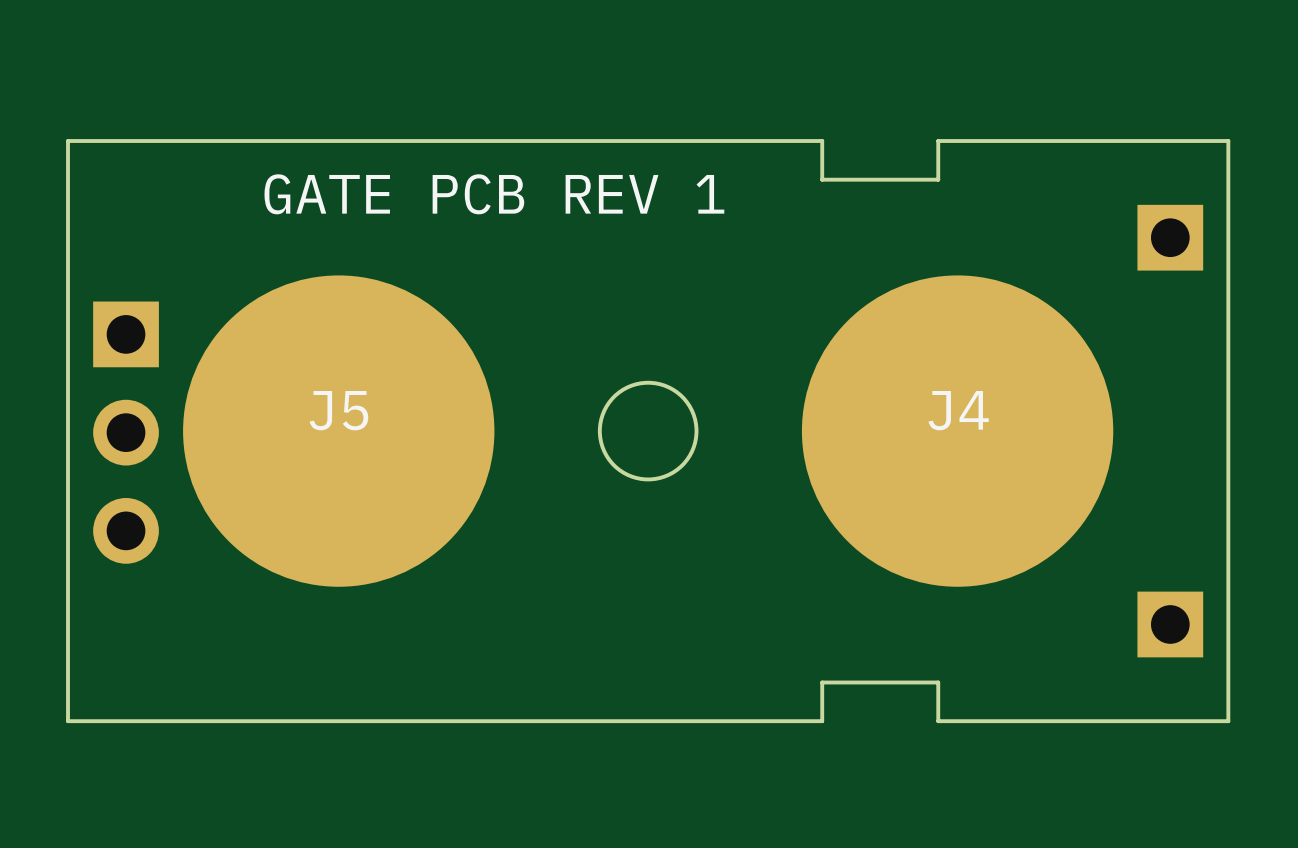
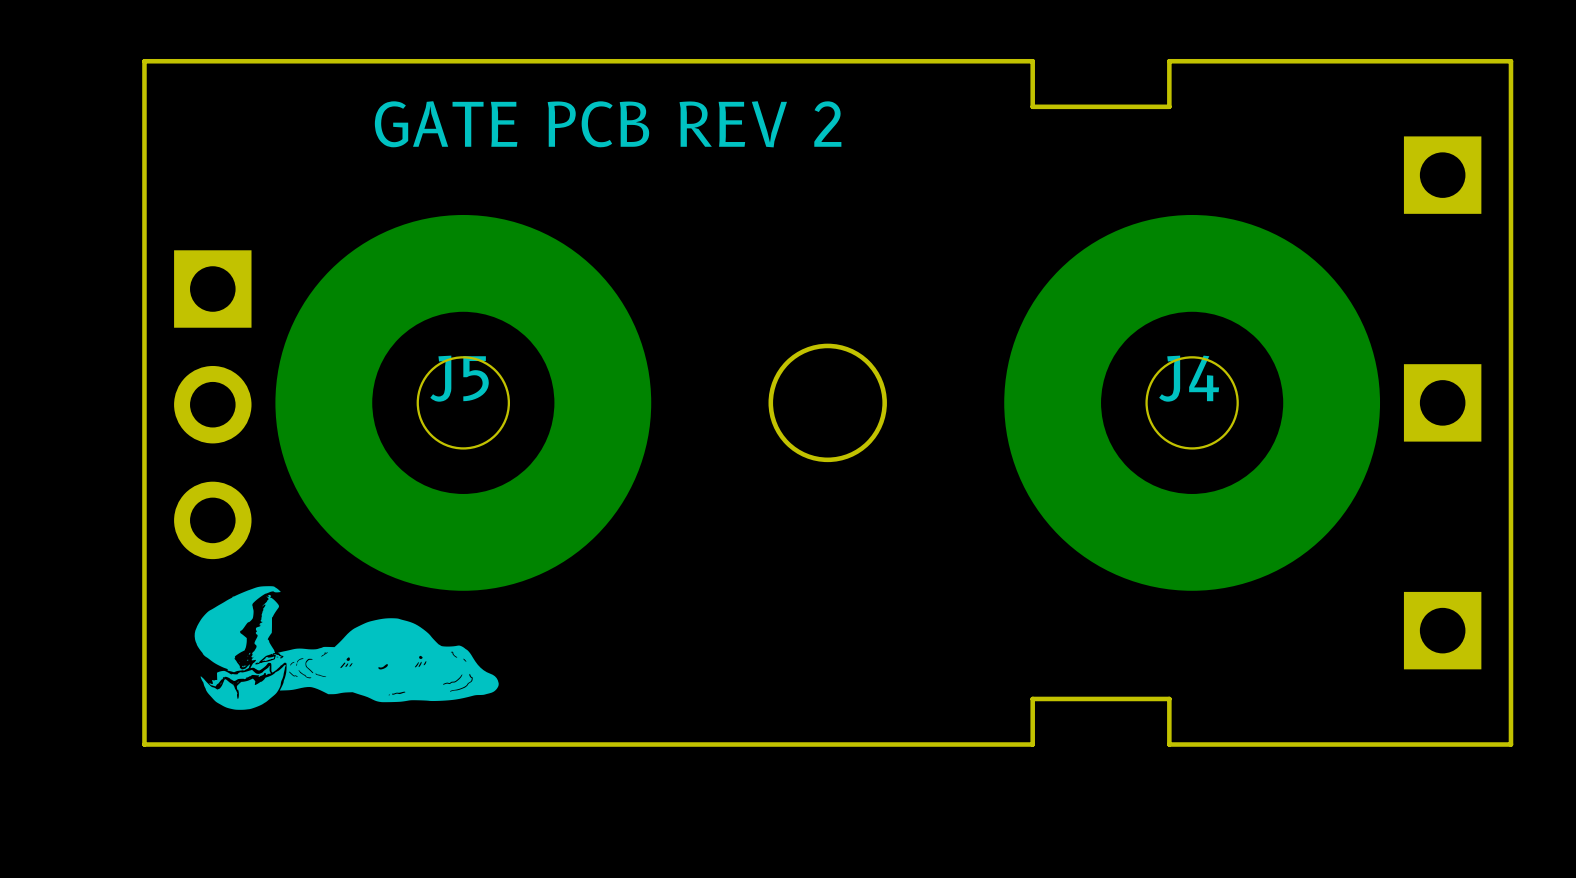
text: GATE PCB REV 1 (494, 194) -> GATE PCB REV 2 (608, 124)
J5 footprint: [183, 275, 495, 587] -> [275, 214, 652, 591]
J4 footprint: [801, 275, 1114, 587] -> [1004, 214, 1381, 591]
part: none -> (1442, 402)
drawing: none -> [194, 586, 499, 710]

